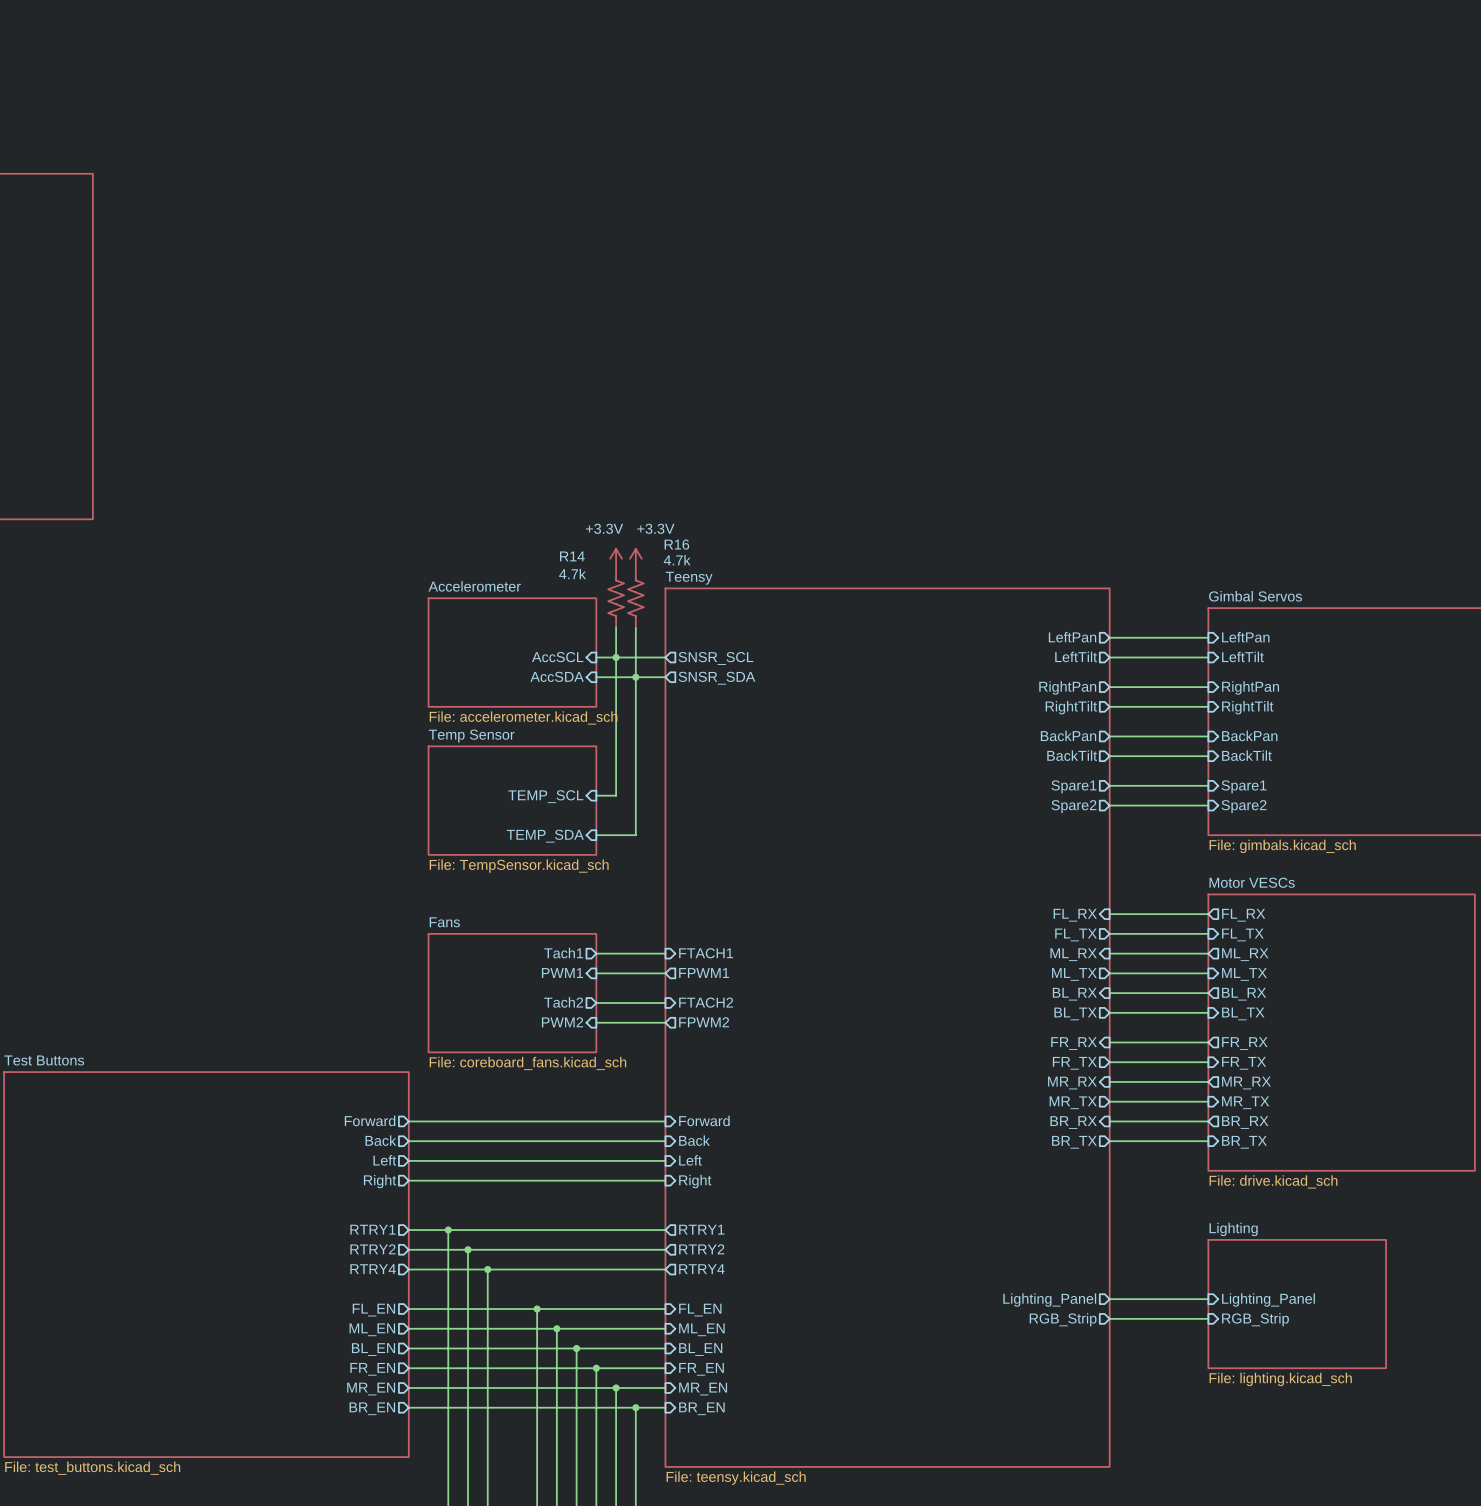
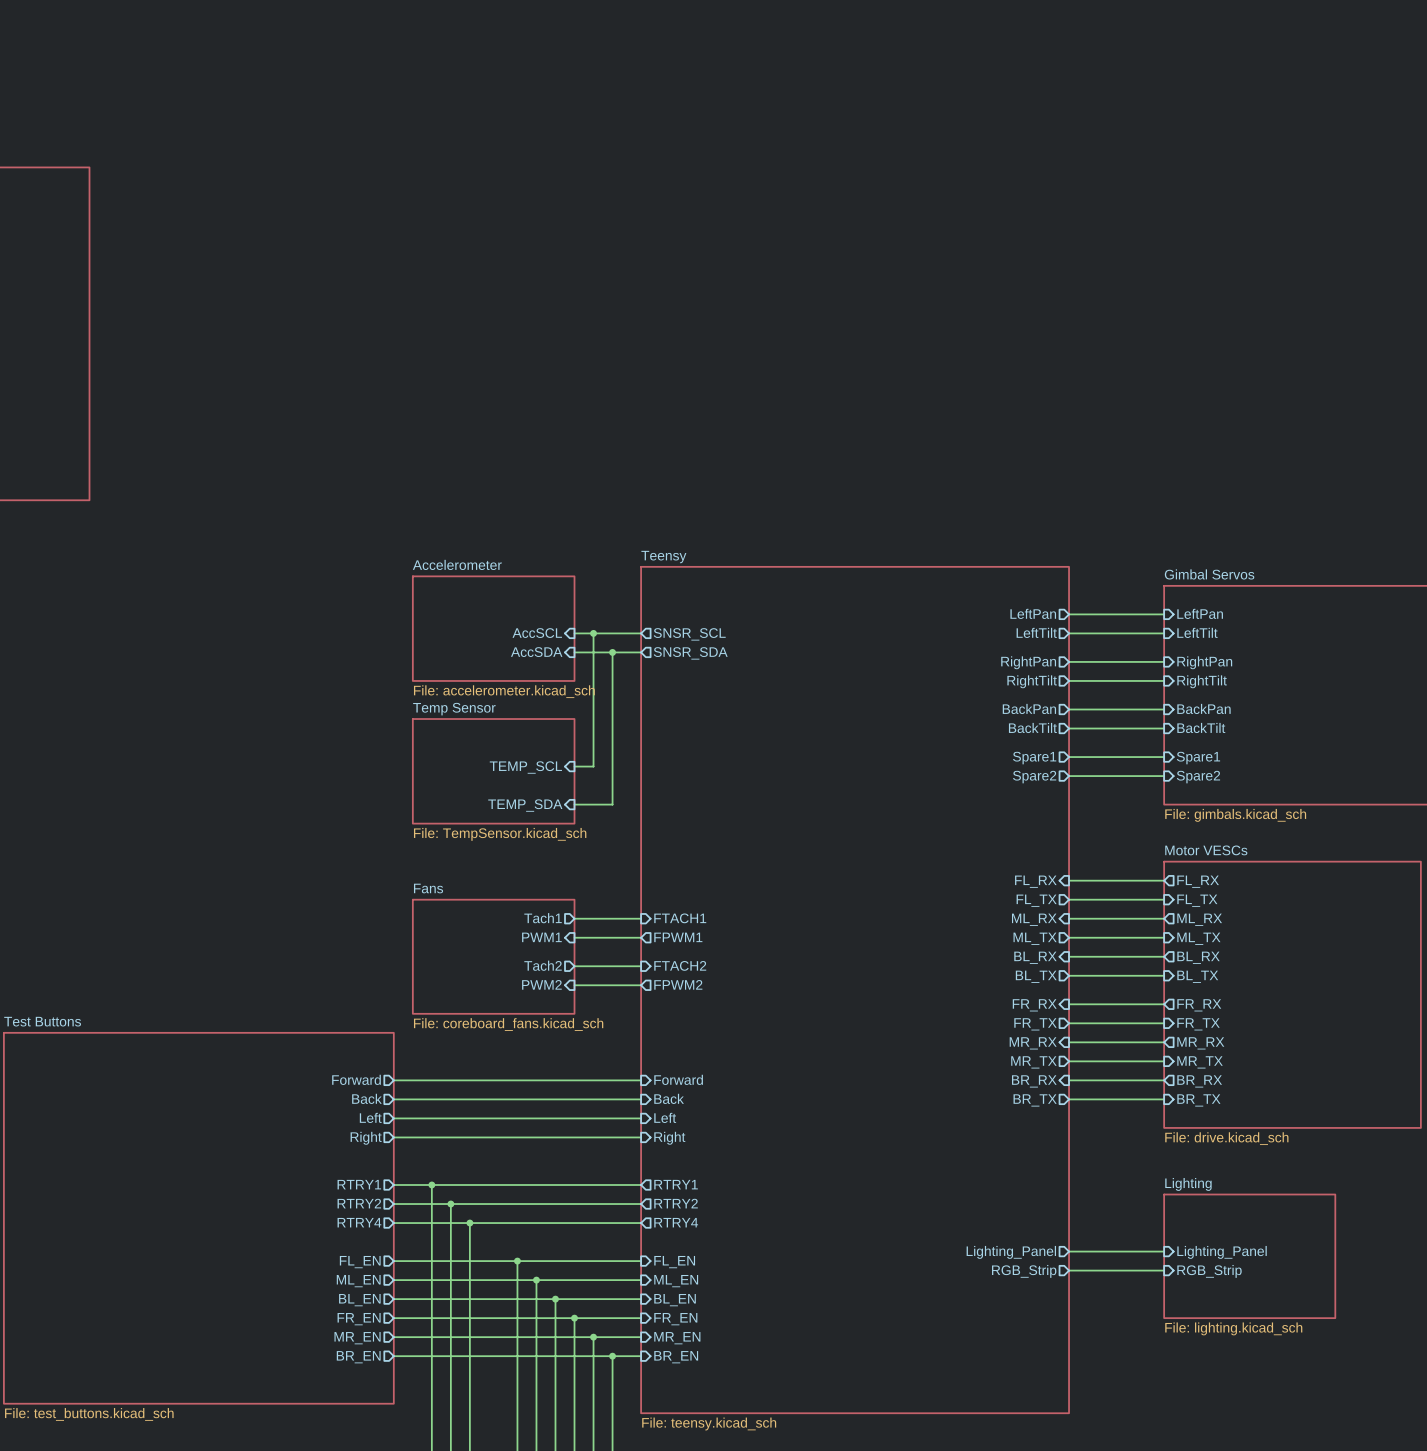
power symbol: +3.3V (616, 558) -> none
power symbol: +3.3V (635, 558) -> none
R14: 4.7k (616, 598) -> none
R16: 4.7k (635, 598) -> none
wire: (616, 627) (616, 657) -> none
wire: (635, 627) (635, 677) -> none

